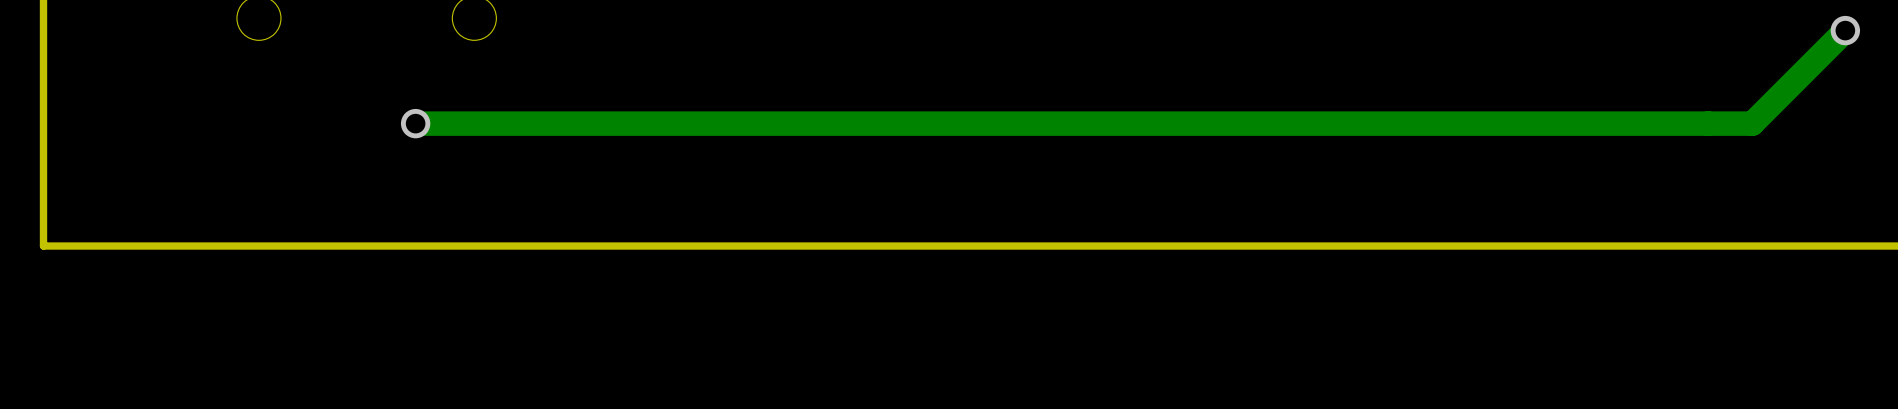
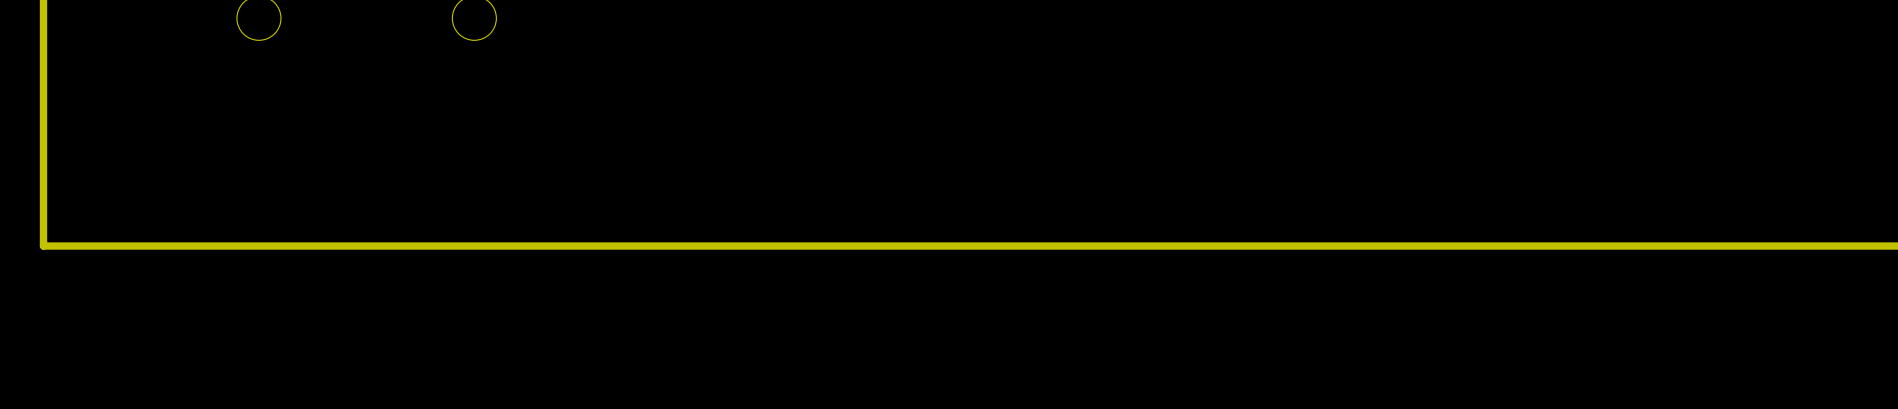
track: (1845, 30) (1752, 123) (415, 123) -> none
via: (1845, 30) -> none
via: (415, 123) -> none

